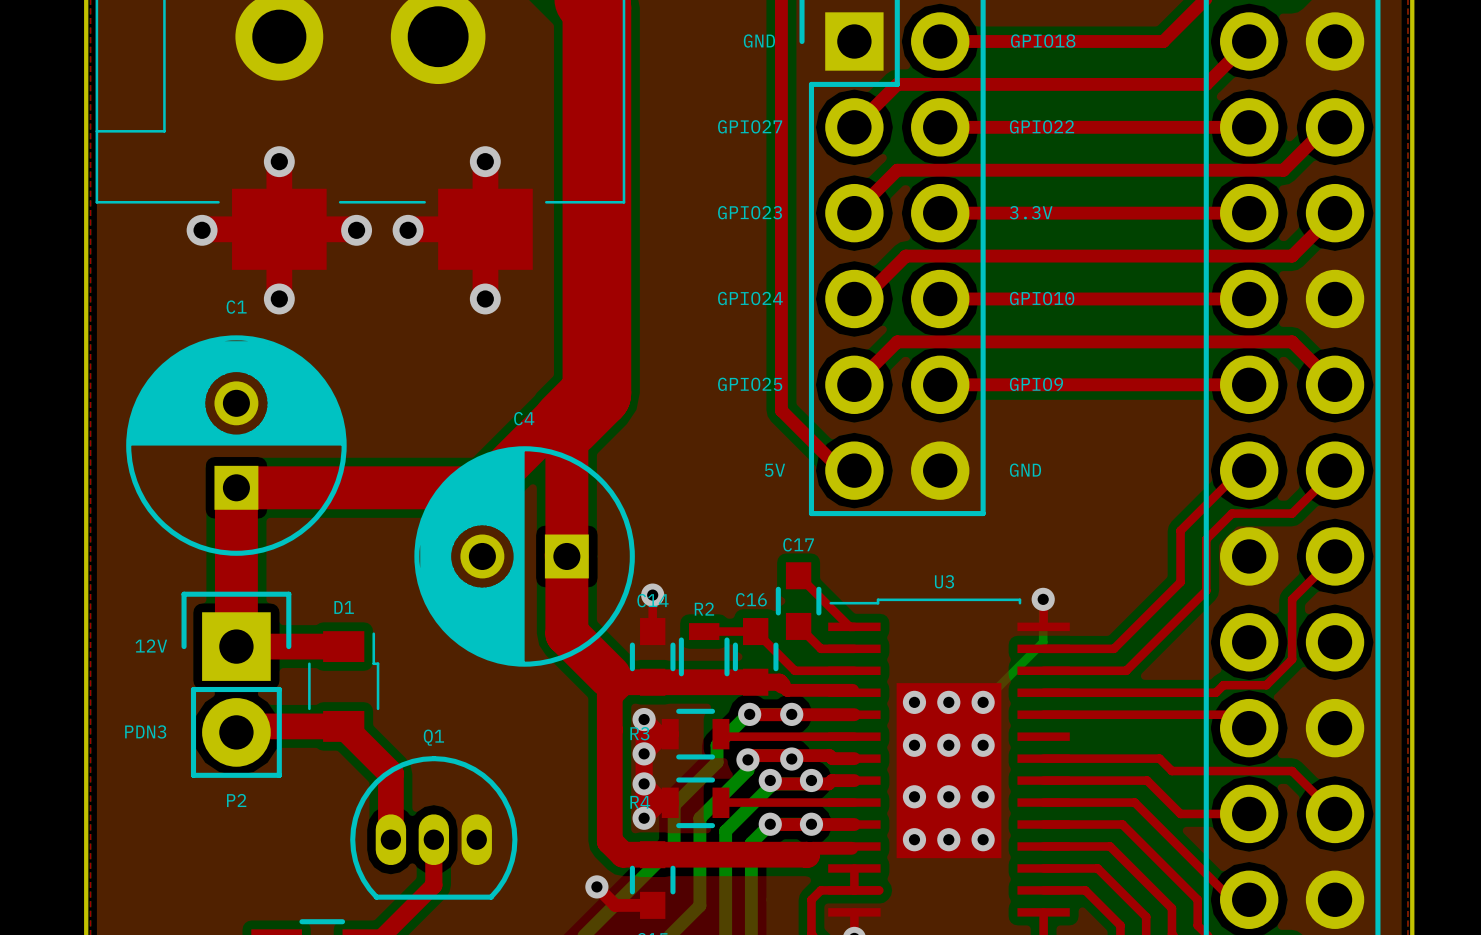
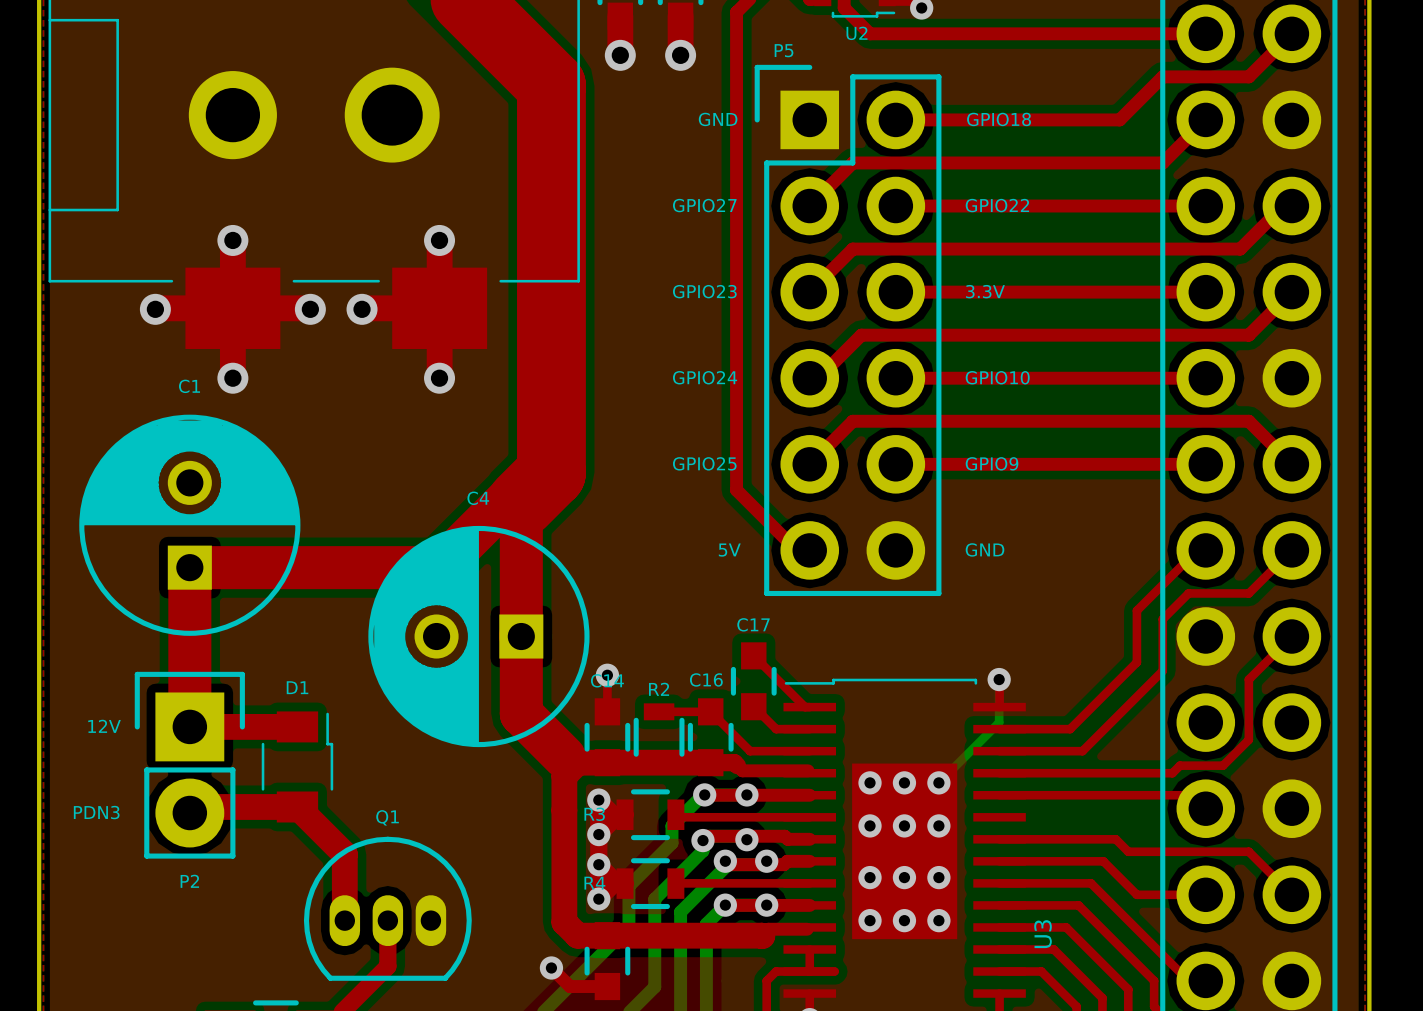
U3 name rotation: 0° (944, 581) -> 90° counterclockwise (1043, 934)
U3 name position: U3 (944, 581) -> U3 (1043, 934)

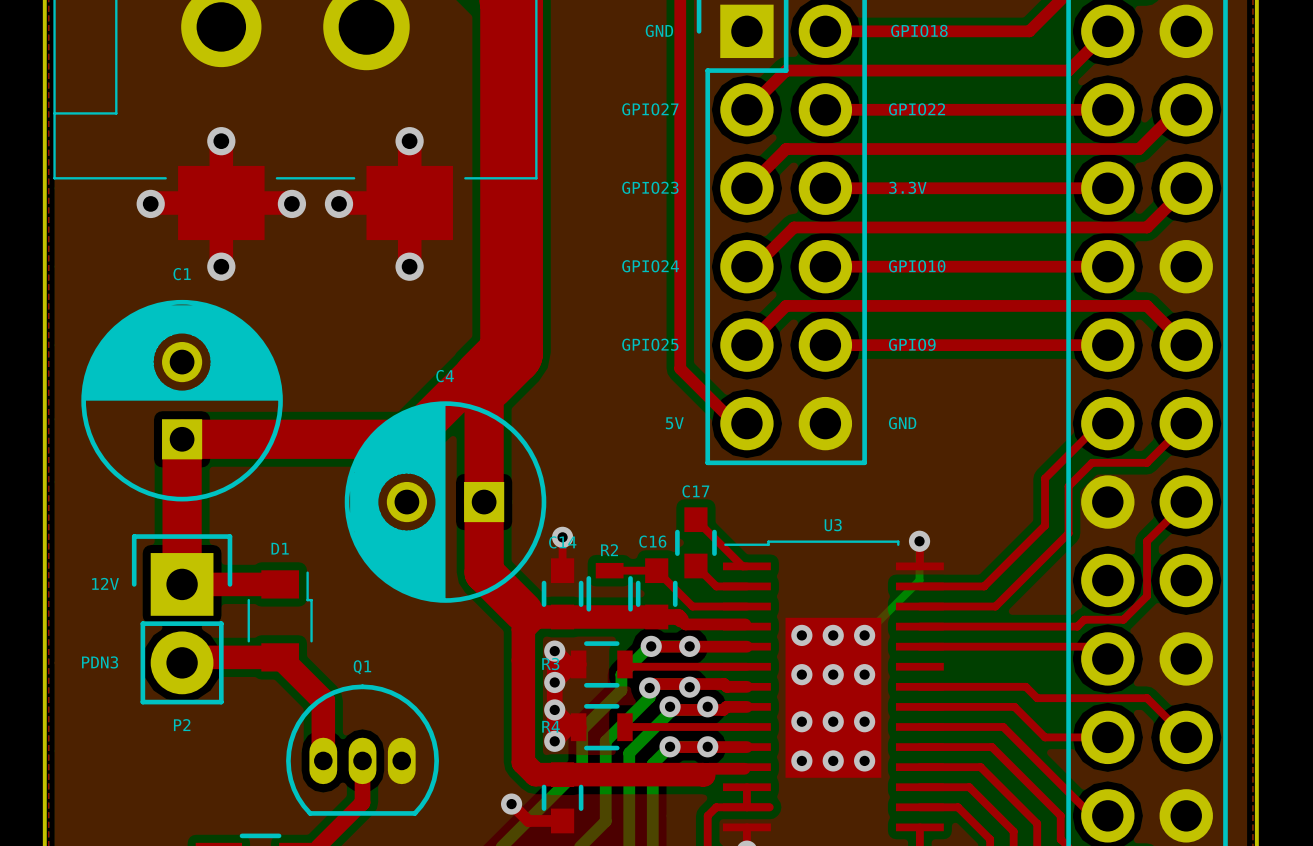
U3 name rotation: 0° (1043, 934) -> 90° clockwise (833, 525)
U3 name position: U3 (1043, 934) -> U3 (833, 525)

